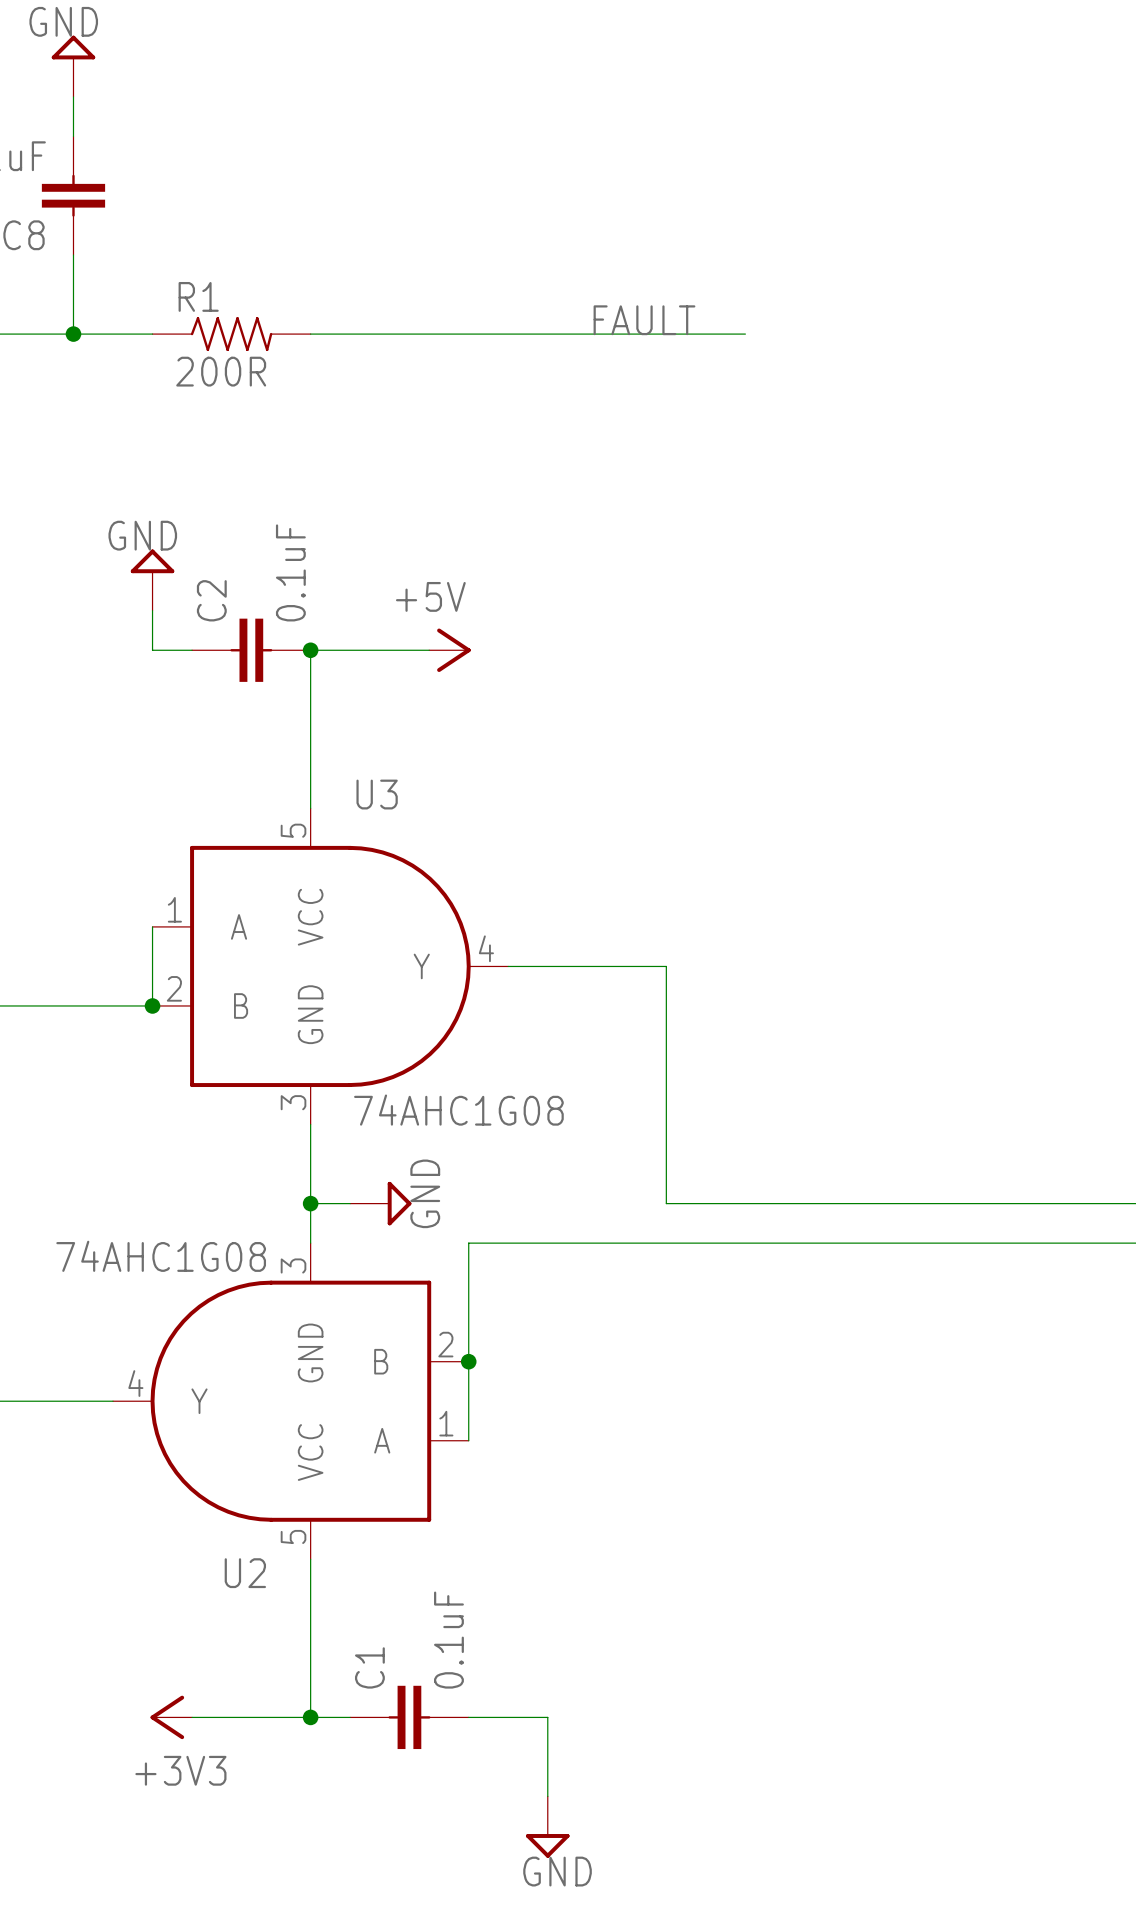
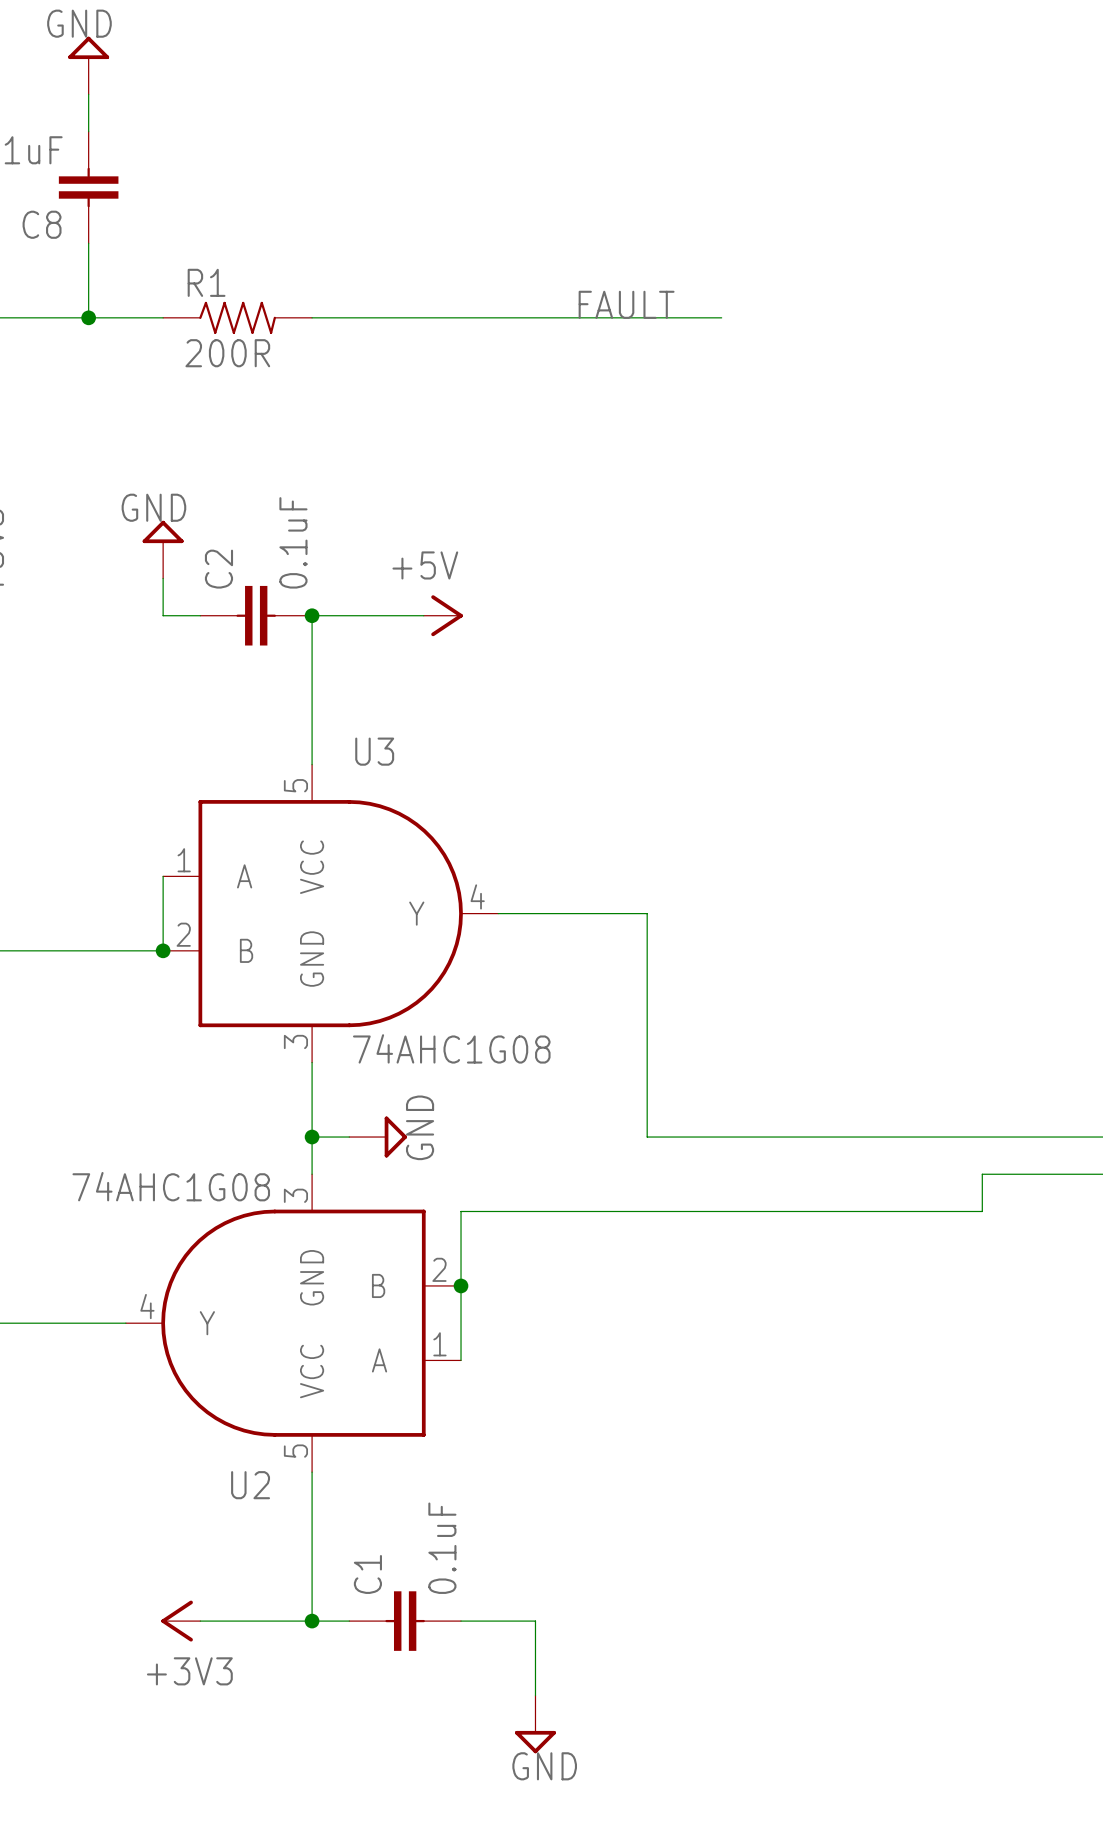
wire: (1022, 1243) (468, 1243) (468, 1282) -> (982, 1174) (982, 1211) (461, 1211)

